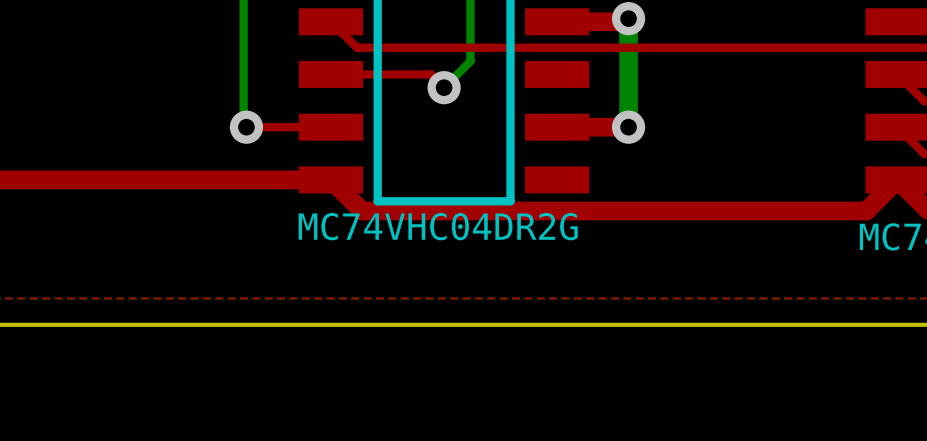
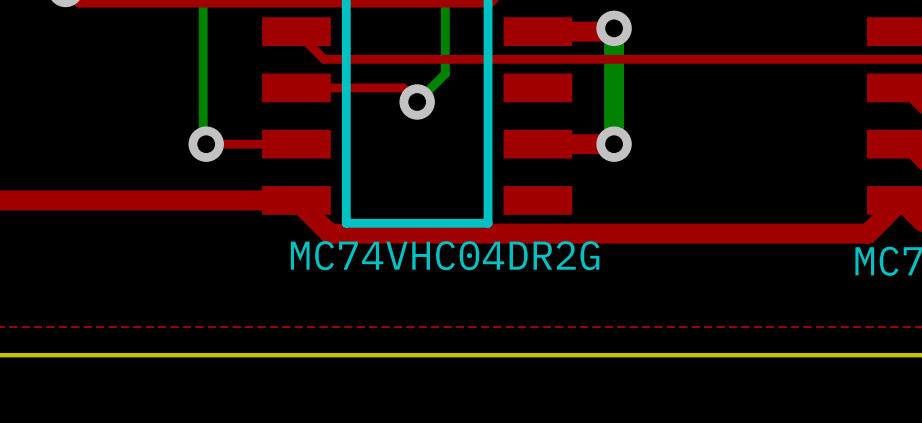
part value position: MC74VHC04DR2G (438, 226) -> MC74VHC04DR2G (445, 255)

